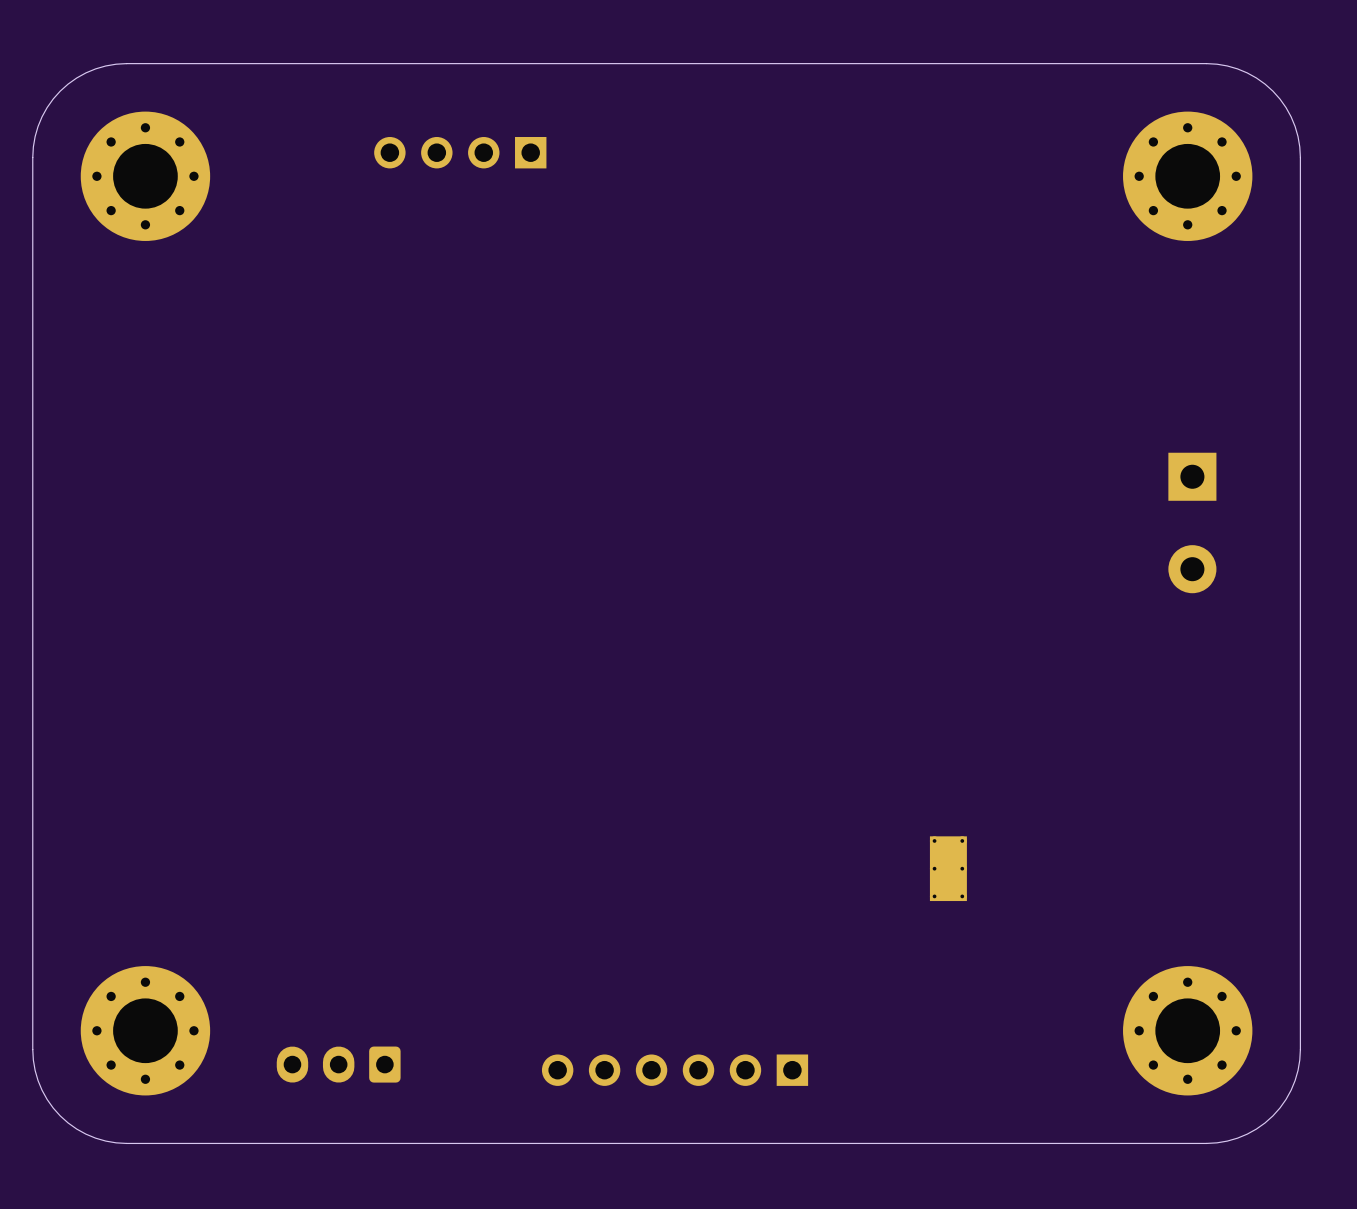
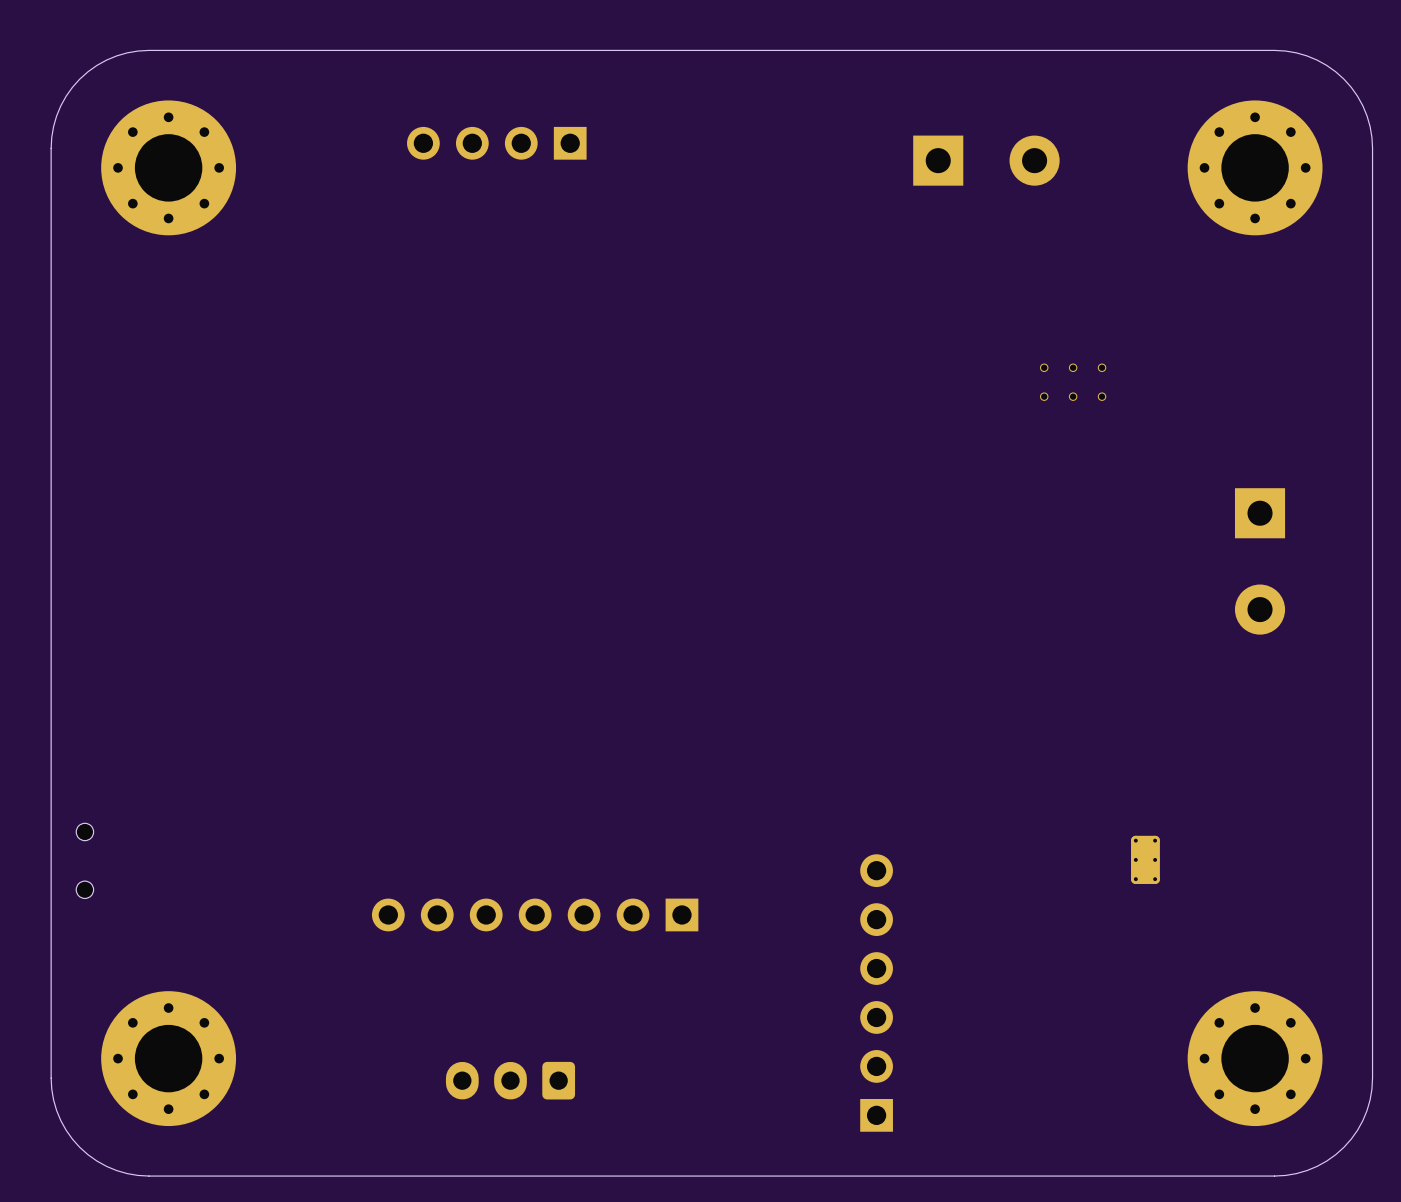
part: none -> (986, 160)
part: none -> (1073, 382)
part position: (1192, 522) -> (1260, 561)
part: none -> (1145, 859)
part: none -> (84, 860)
part: (948, 868) -> none
part: none -> (535, 914)
part position: (338, 1064) -> (510, 1080)
part rotation: 0° (675, 1070) -> 90° clockwise (876, 993)
part position: (675, 1070) -> (876, 993)

